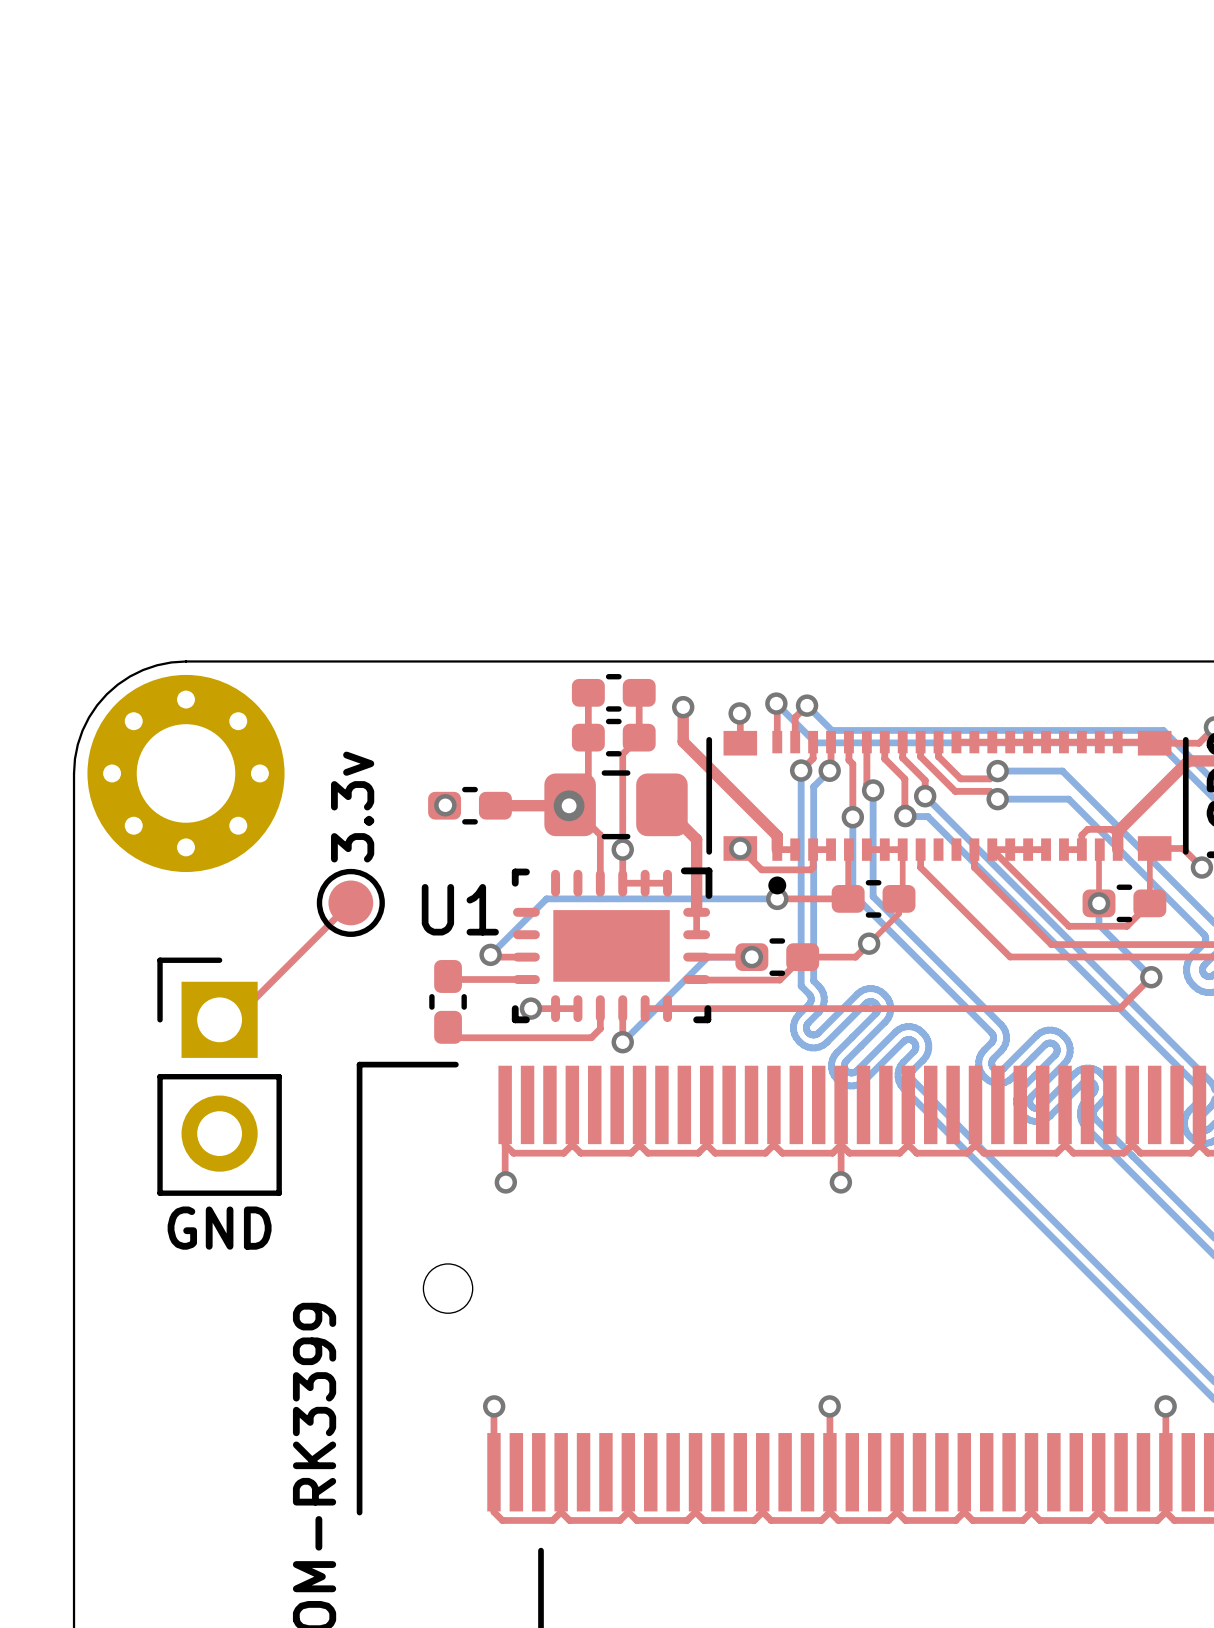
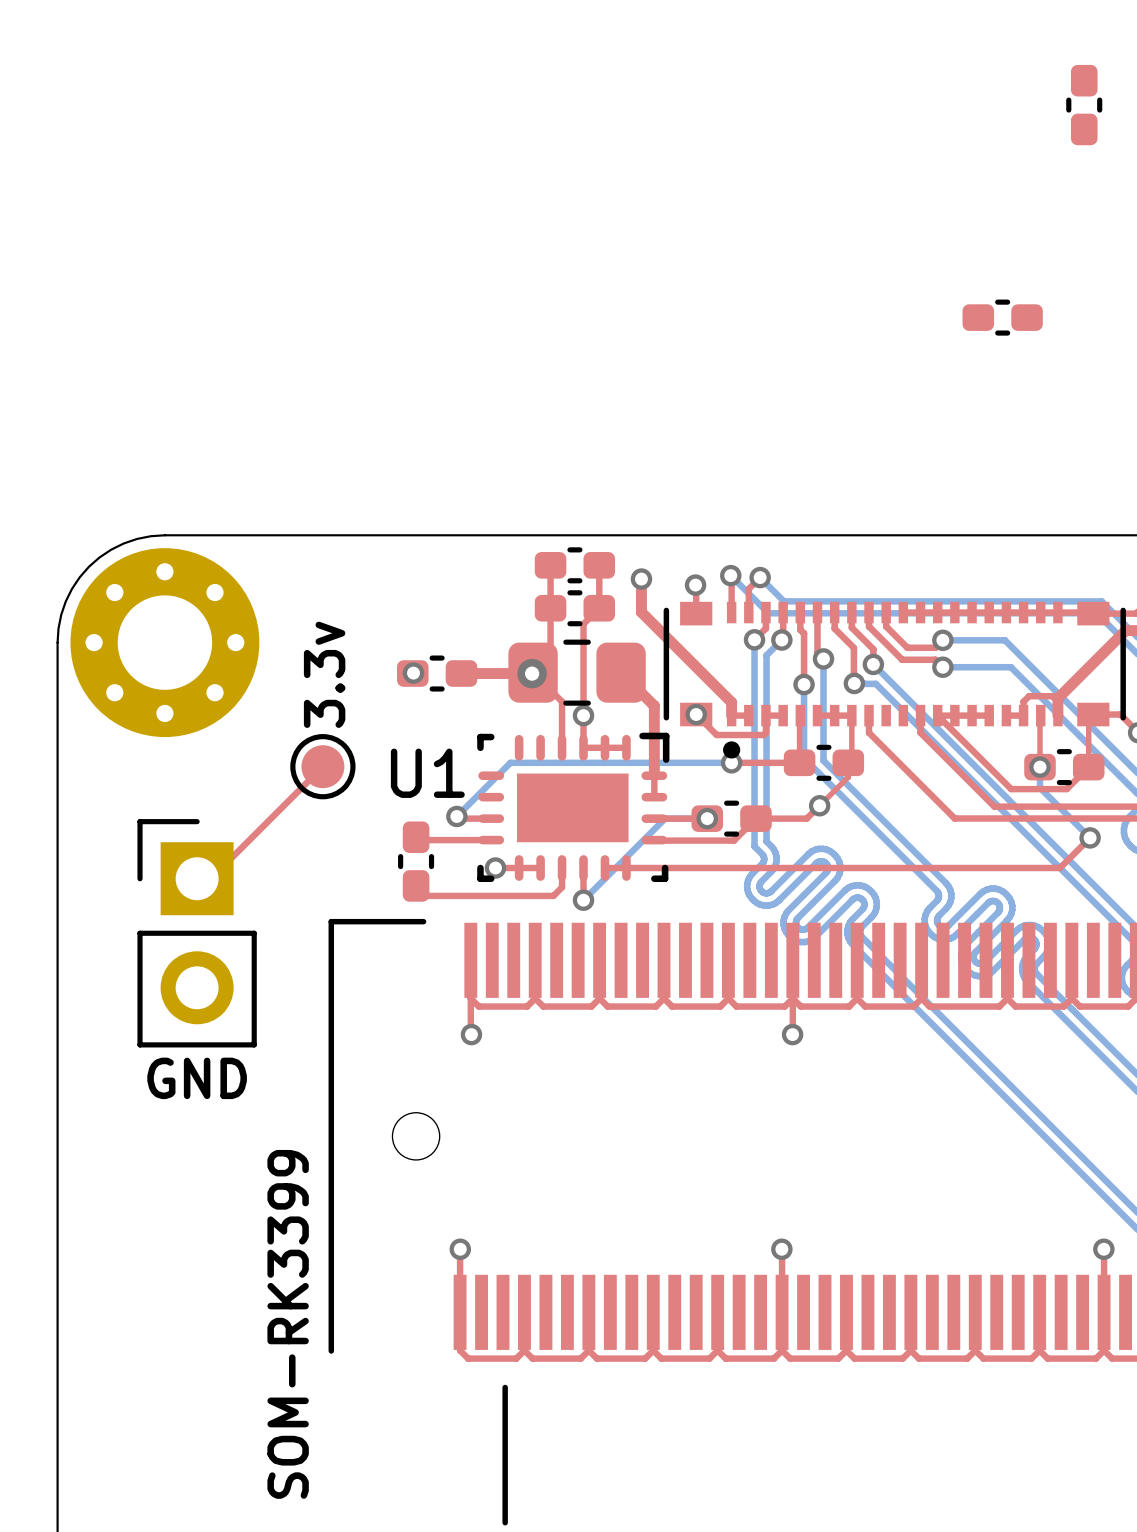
part: none -> (1084, 105)
part: none -> (1002, 317)

